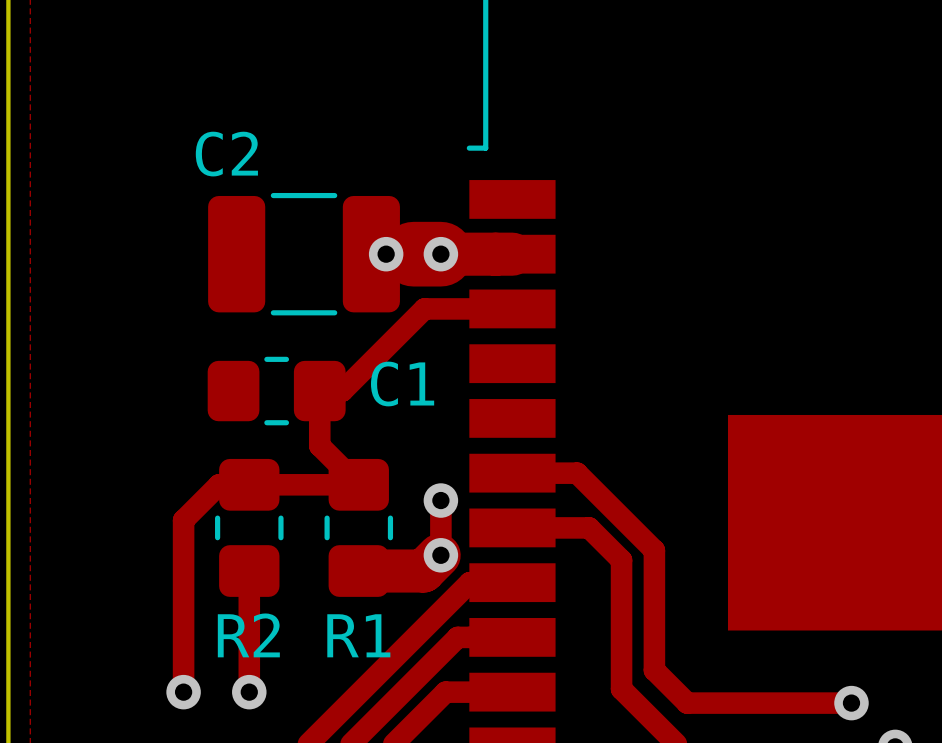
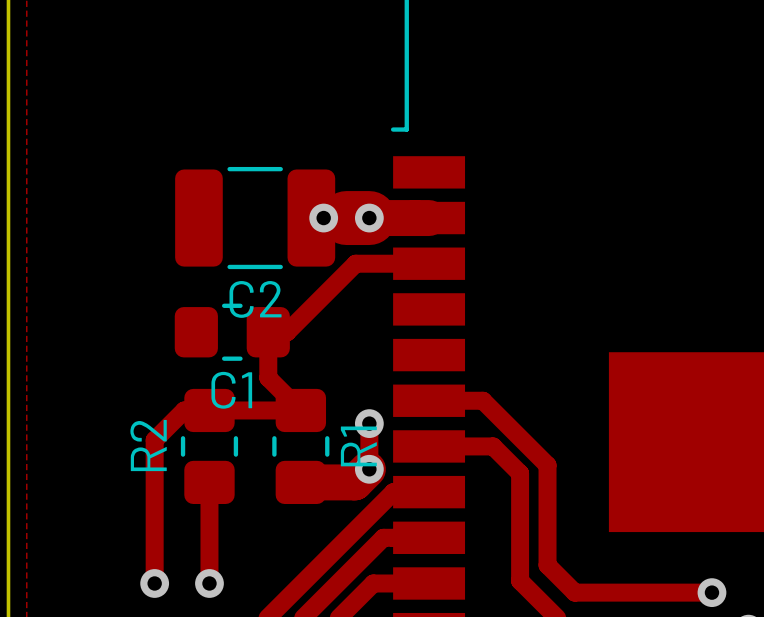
C2 name position: C2 (226, 154) -> C2 (255, 299)
C1 name position: C1 (402, 383) -> C1 (231, 390)
R2 name rotation: 0° (248, 635) -> 90° counterclockwise (148, 445)
R2 name position: R2 (248, 635) -> R2 (148, 445)
R1 name rotation: 0° (358, 635) -> 90° counterclockwise (358, 446)
R1 name position: R1 (358, 635) -> R1 (358, 446)

